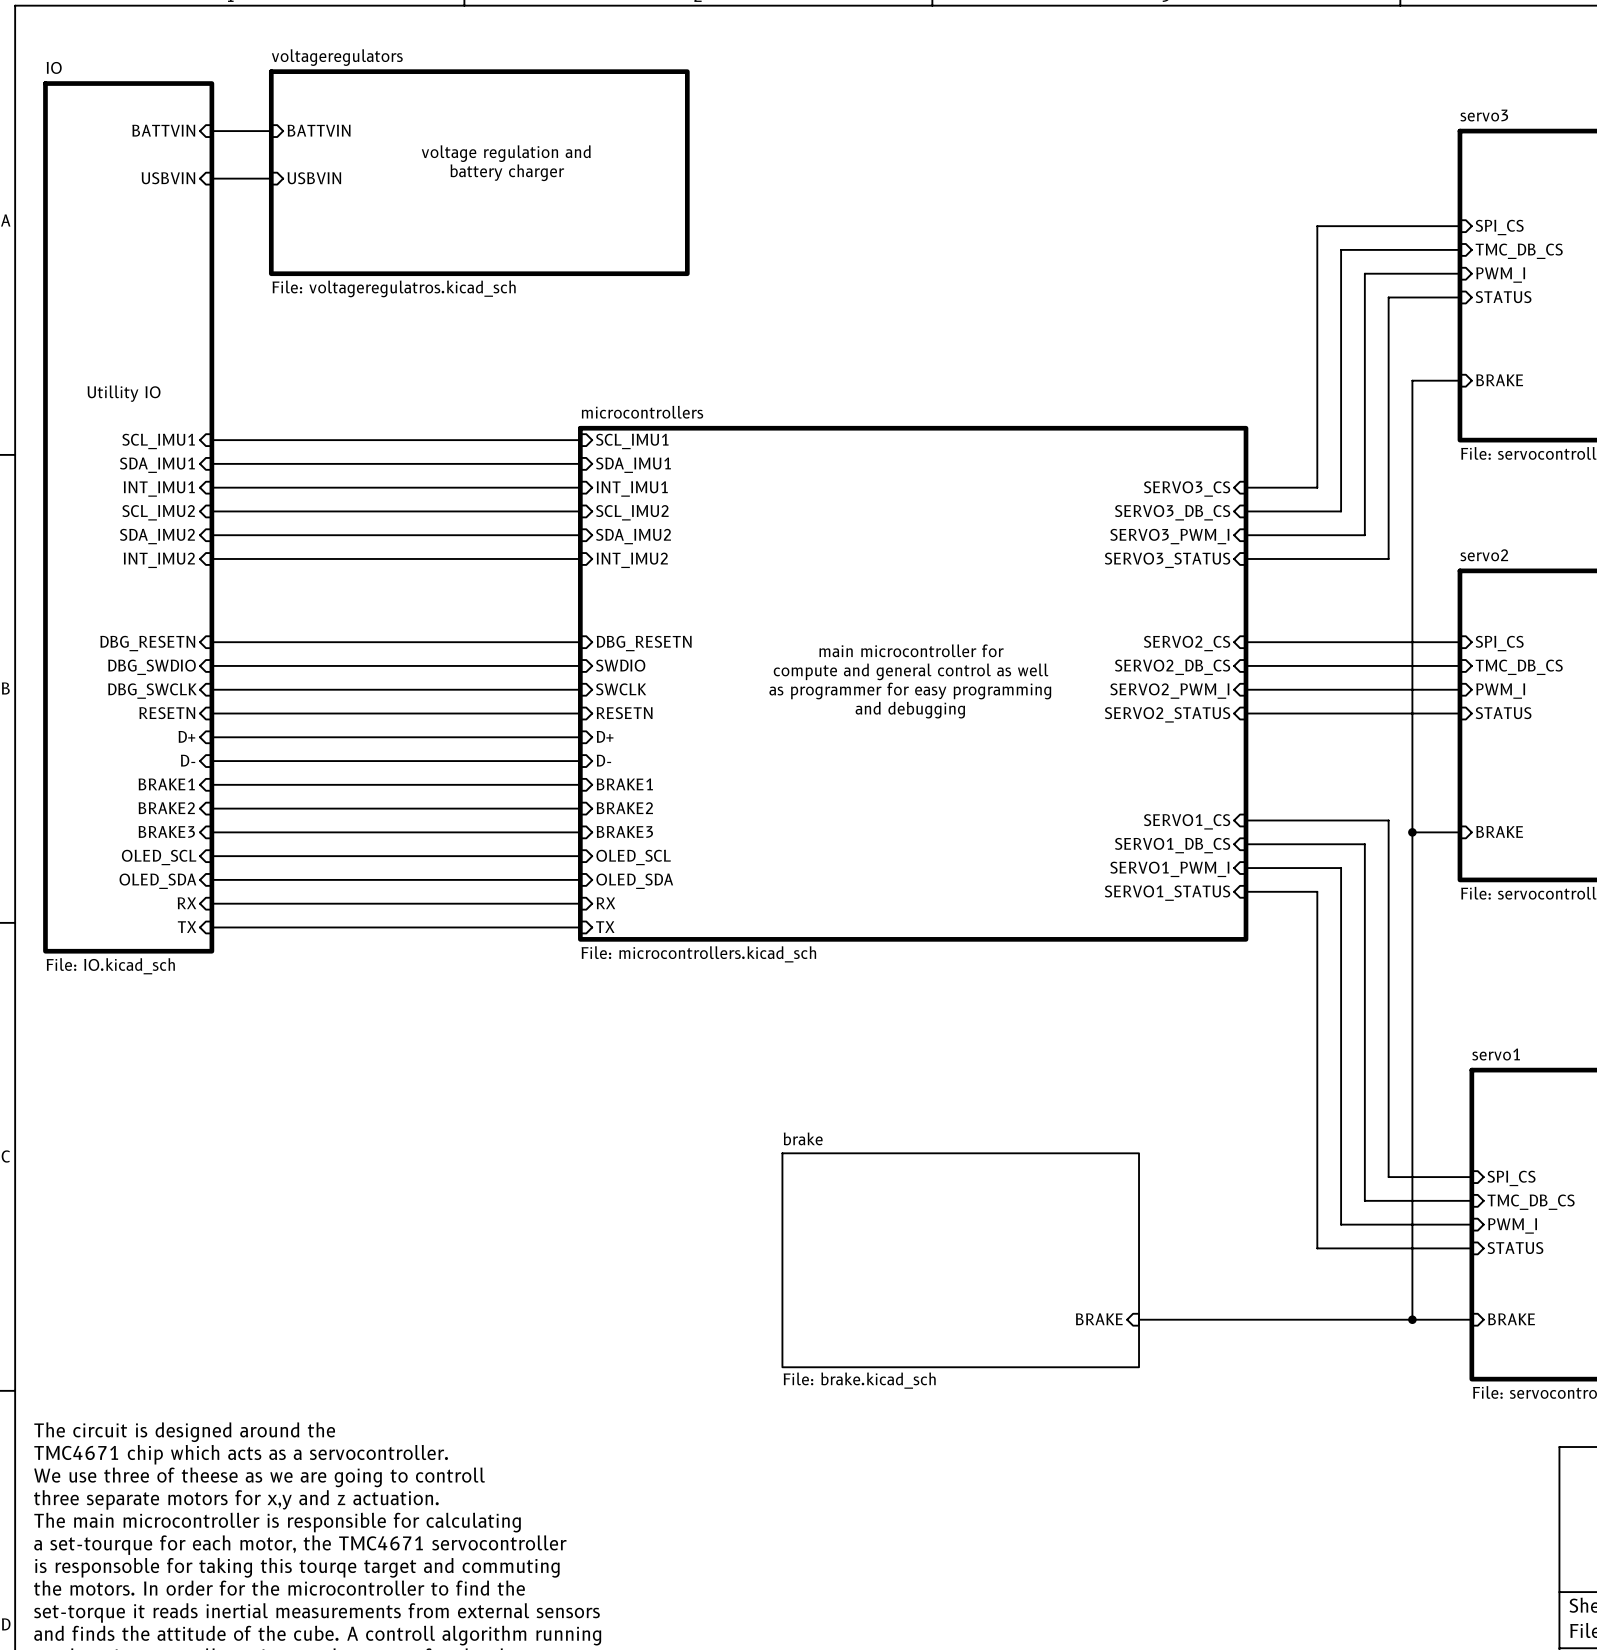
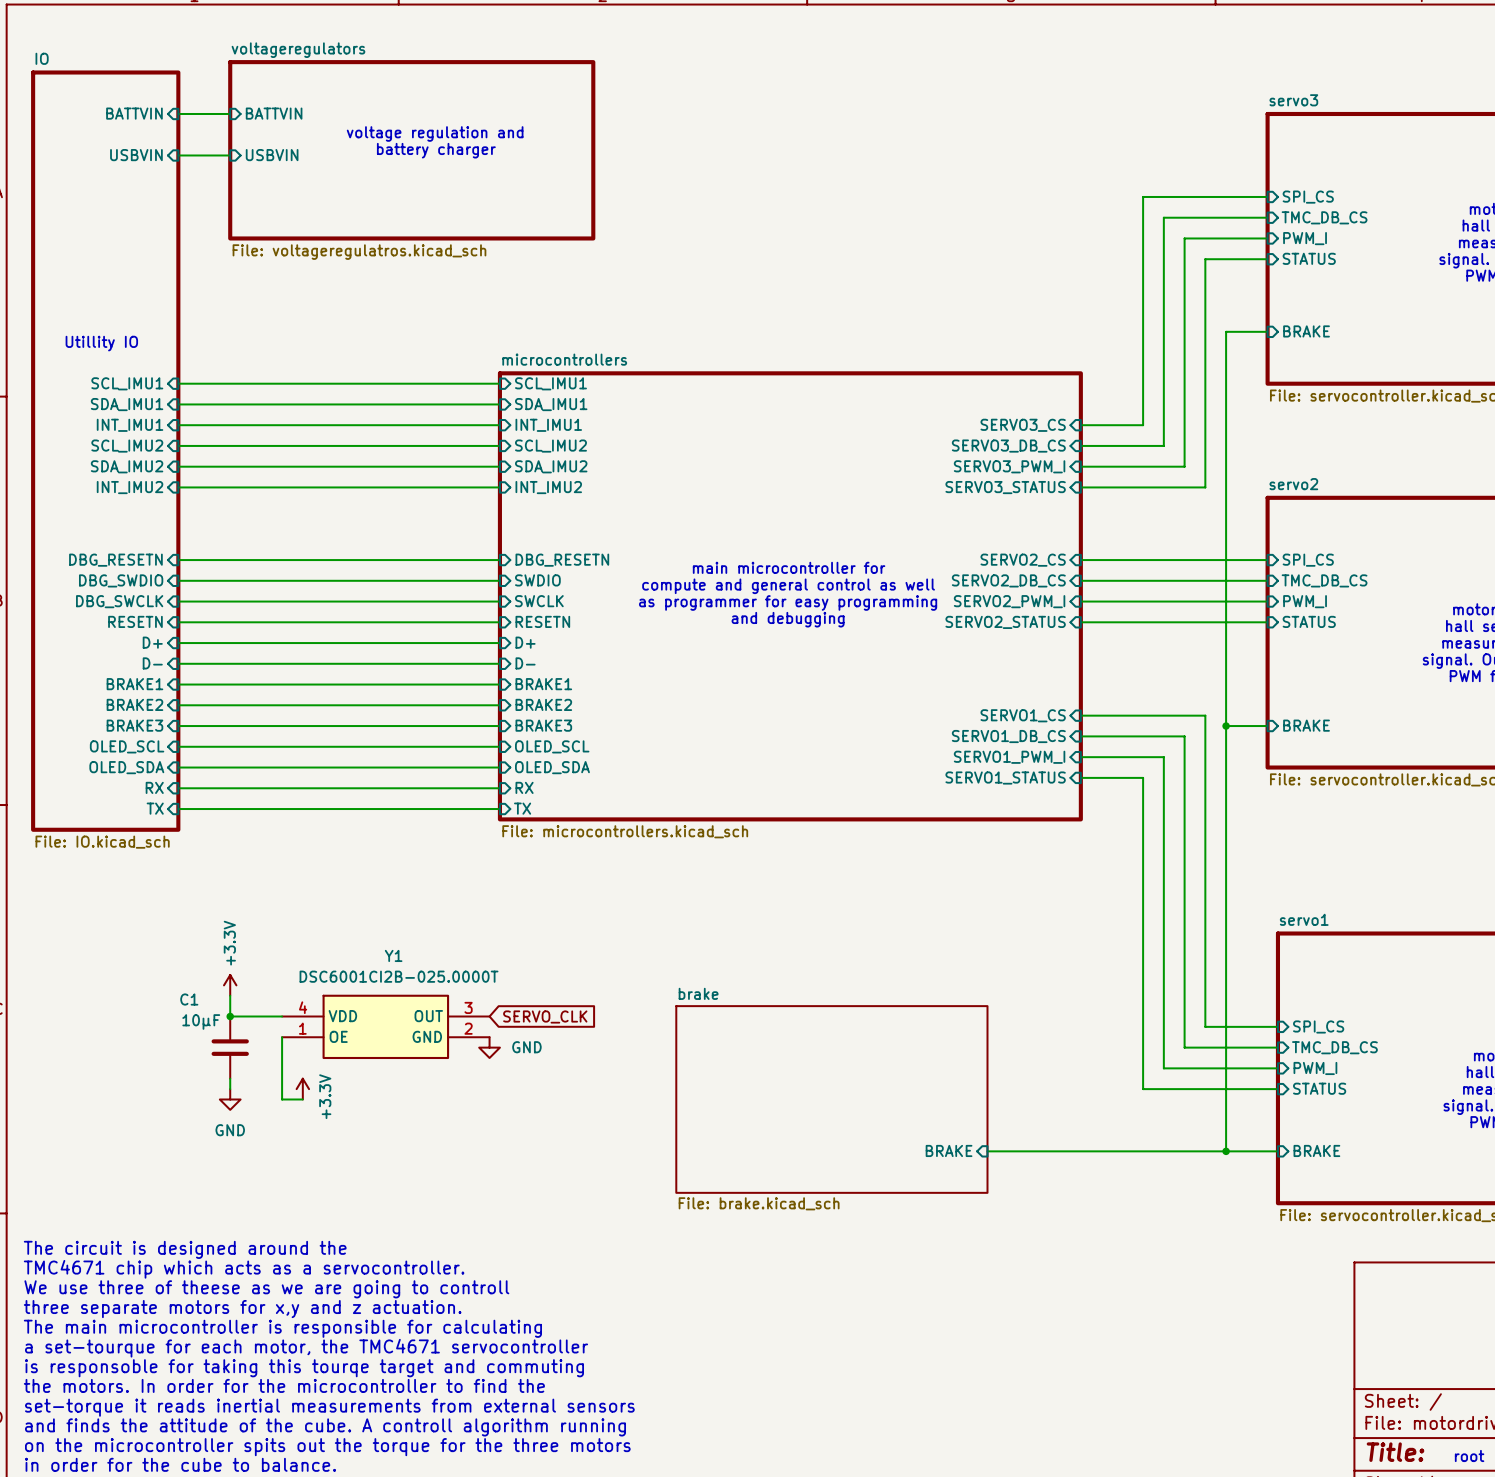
power symbol: none -> +3.3V (230, 985)
wire: none -> (230, 995) (230, 1016) (282, 1016)
junction: none -> (230, 1016)
global label: none -> SERVO_CLK (545, 1016)
Y1: none -> DSC6001CI2B-025.0000T (385, 1026)
wire: none -> (282, 1037) (282, 1099) (302, 1099)
C1: none -> 10µF (230, 1047)
power symbol: none -> GND (489, 1047)
wire: none -> (230, 1078) (230, 1089)
power symbol: none -> +3.3V (302, 1089)
power symbol: none -> GND (230, 1099)

